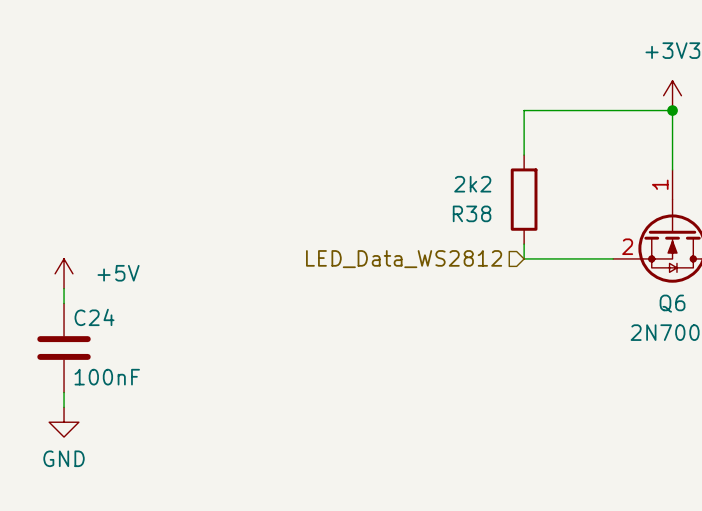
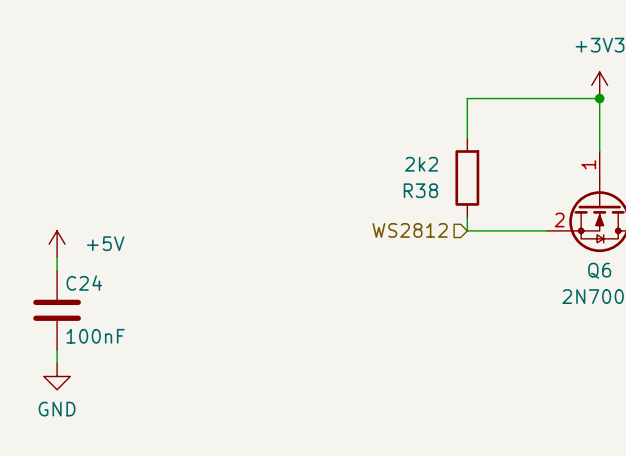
hierarchical label: LED_Data_WS2812 (404, 259) -> WS2812 (410, 230)

